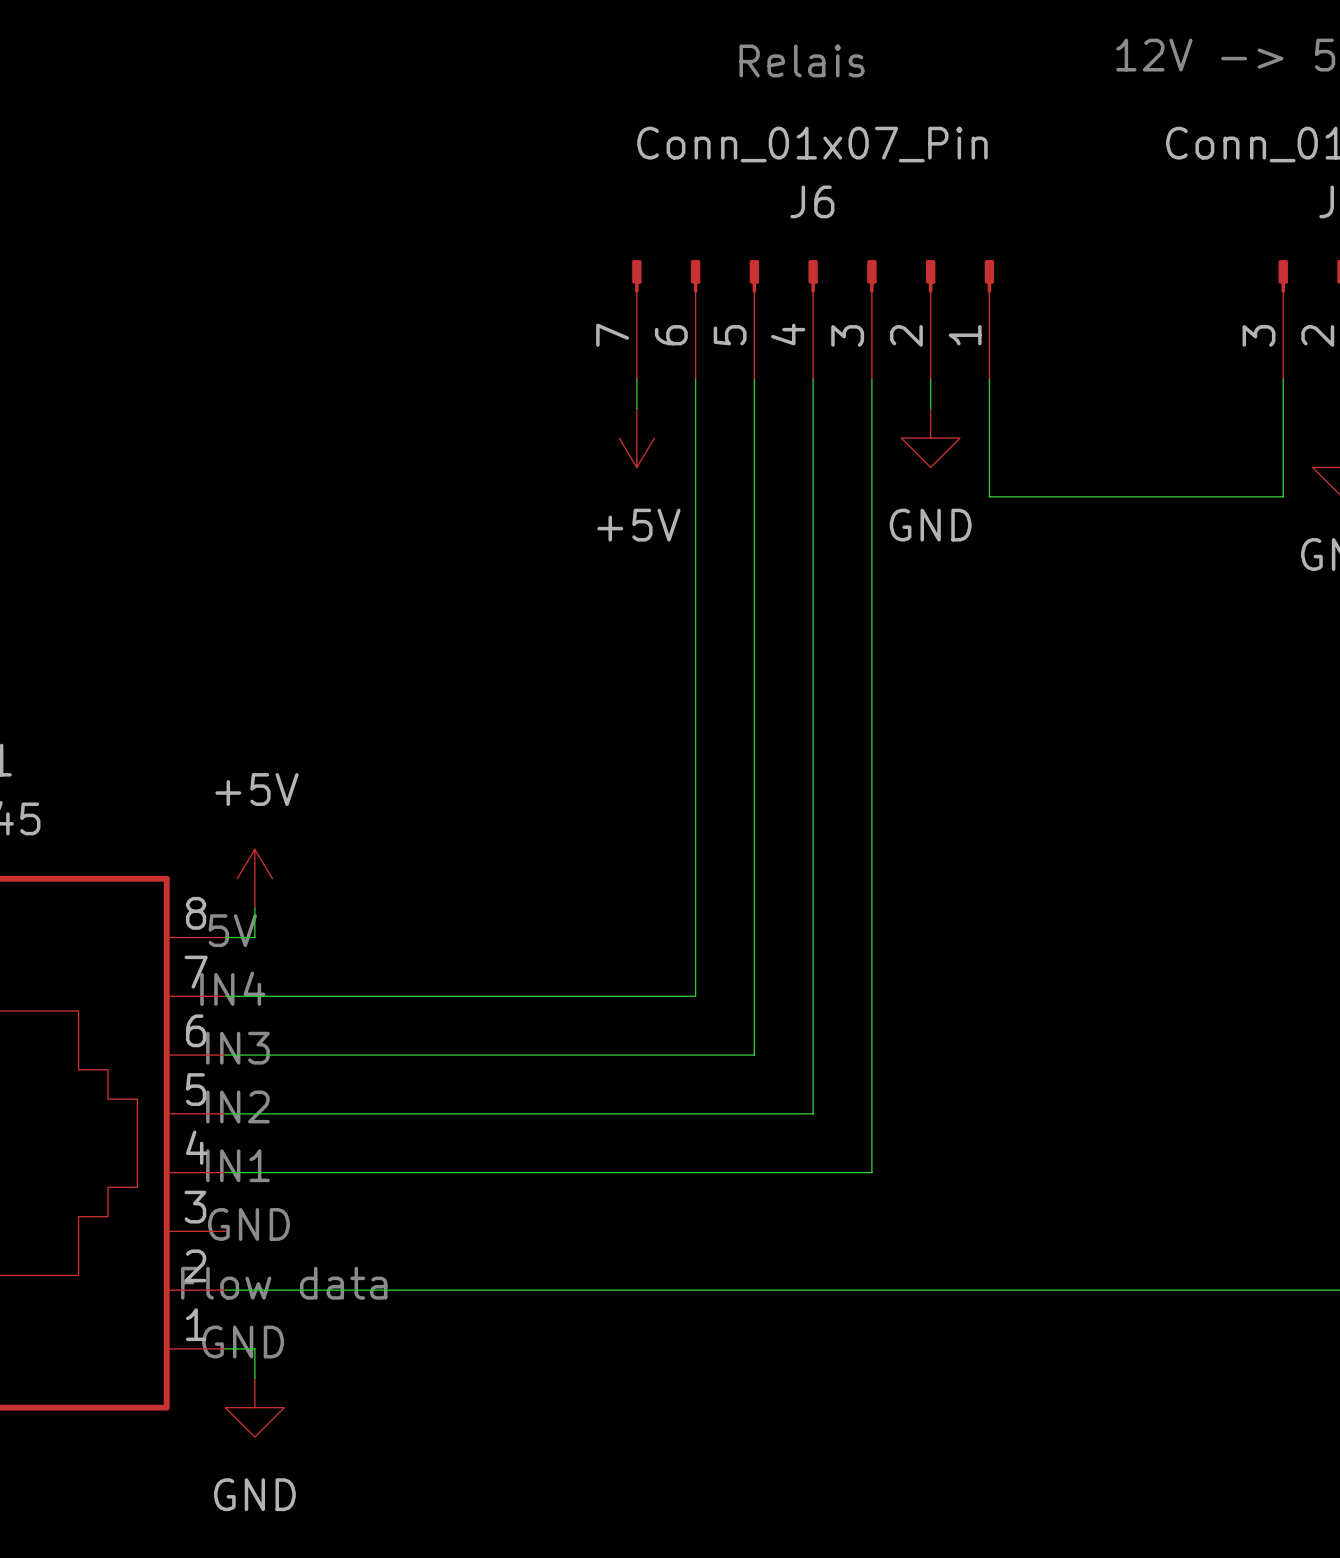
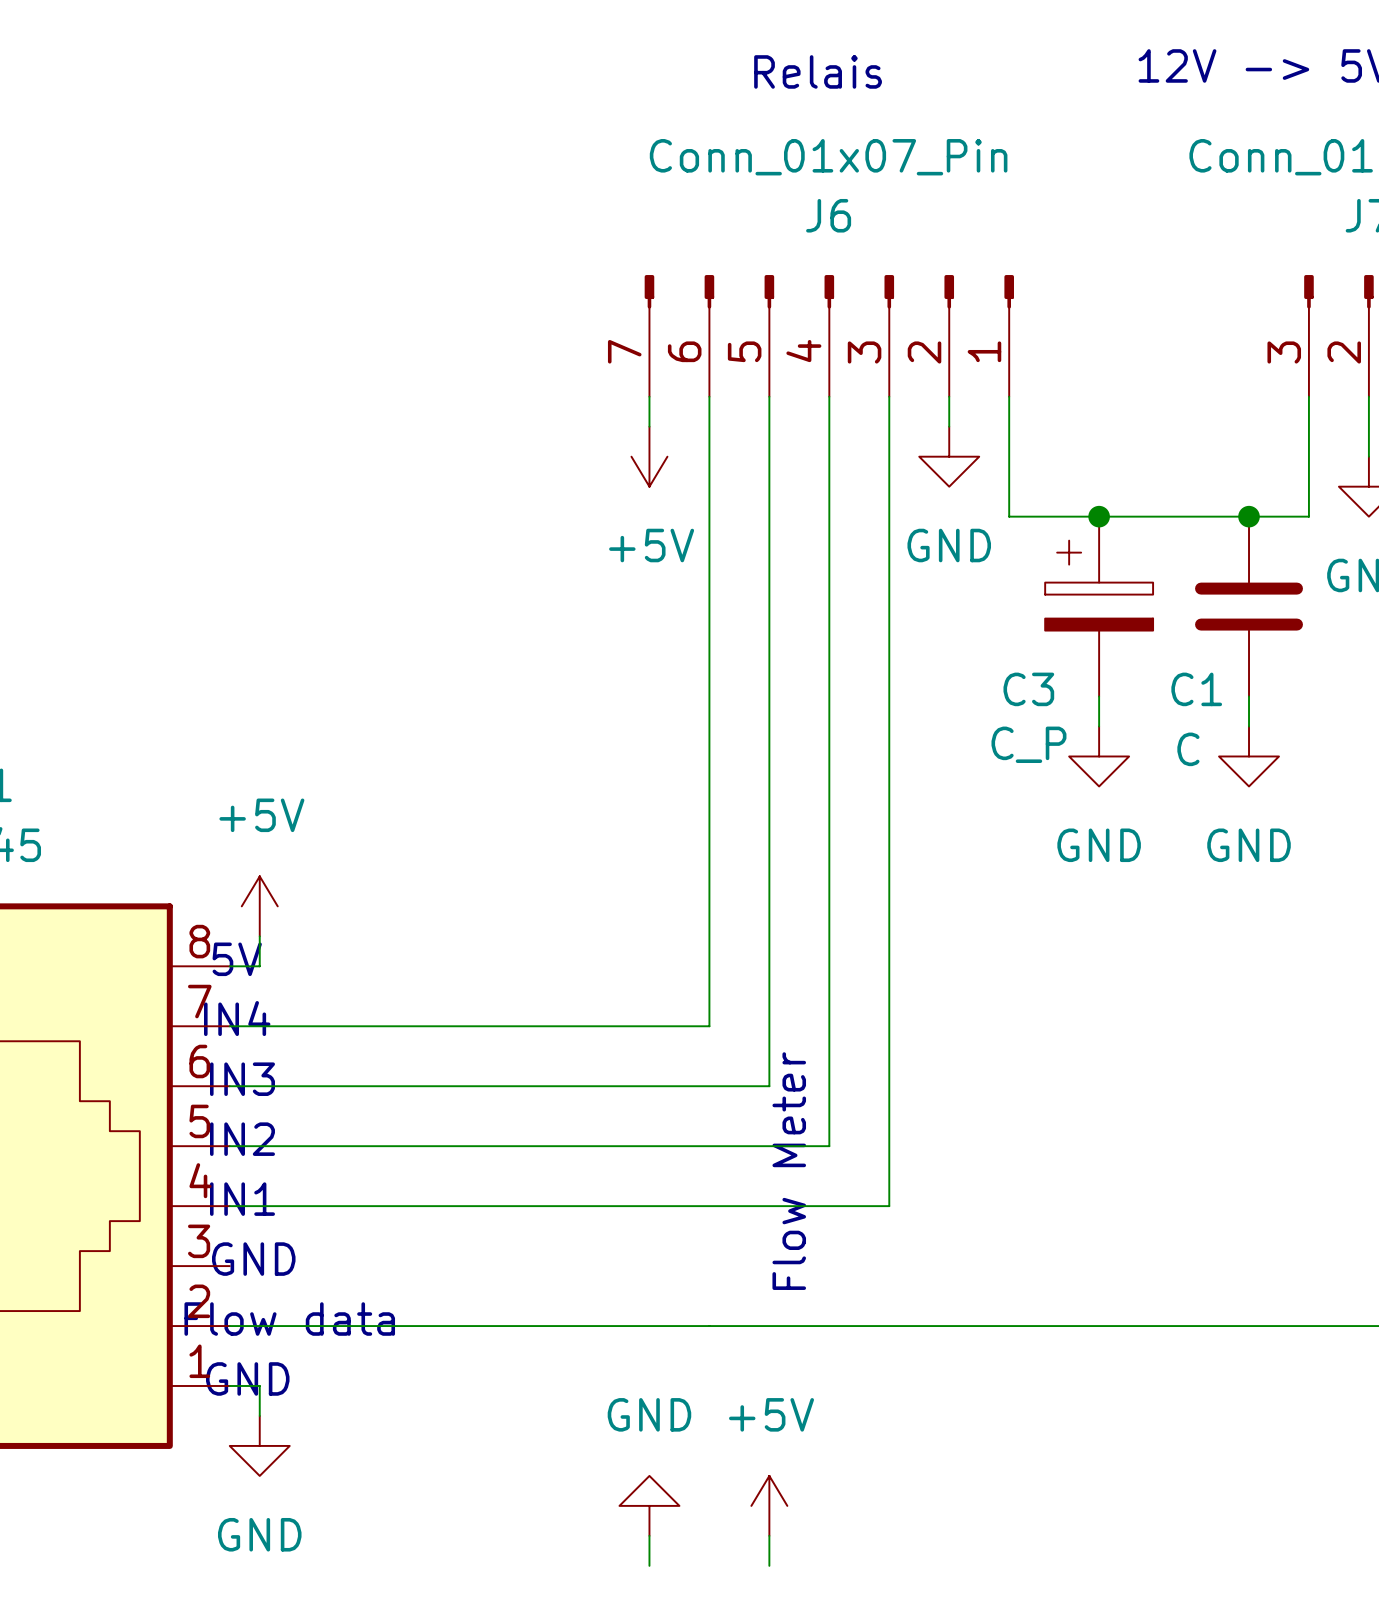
junction: none -> (1099, 516)
junction: none -> (1249, 516)
C3: none -> C_P (1099, 606)
C1: none -> C (1249, 606)
wire: none -> (1099, 696) (1099, 726)
wire: none -> (1249, 696) (1249, 726)
power symbol: none -> GND (1099, 756)
power symbol: none -> GND (1249, 756)
text: none -> Flow Meter (789, 1171)
power symbol: none -> GND (649, 1505)
power symbol: none -> +5V (769, 1505)
wire: none -> (649, 1535) (649, 1565)
wire: none -> (769, 1535) (769, 1565)

